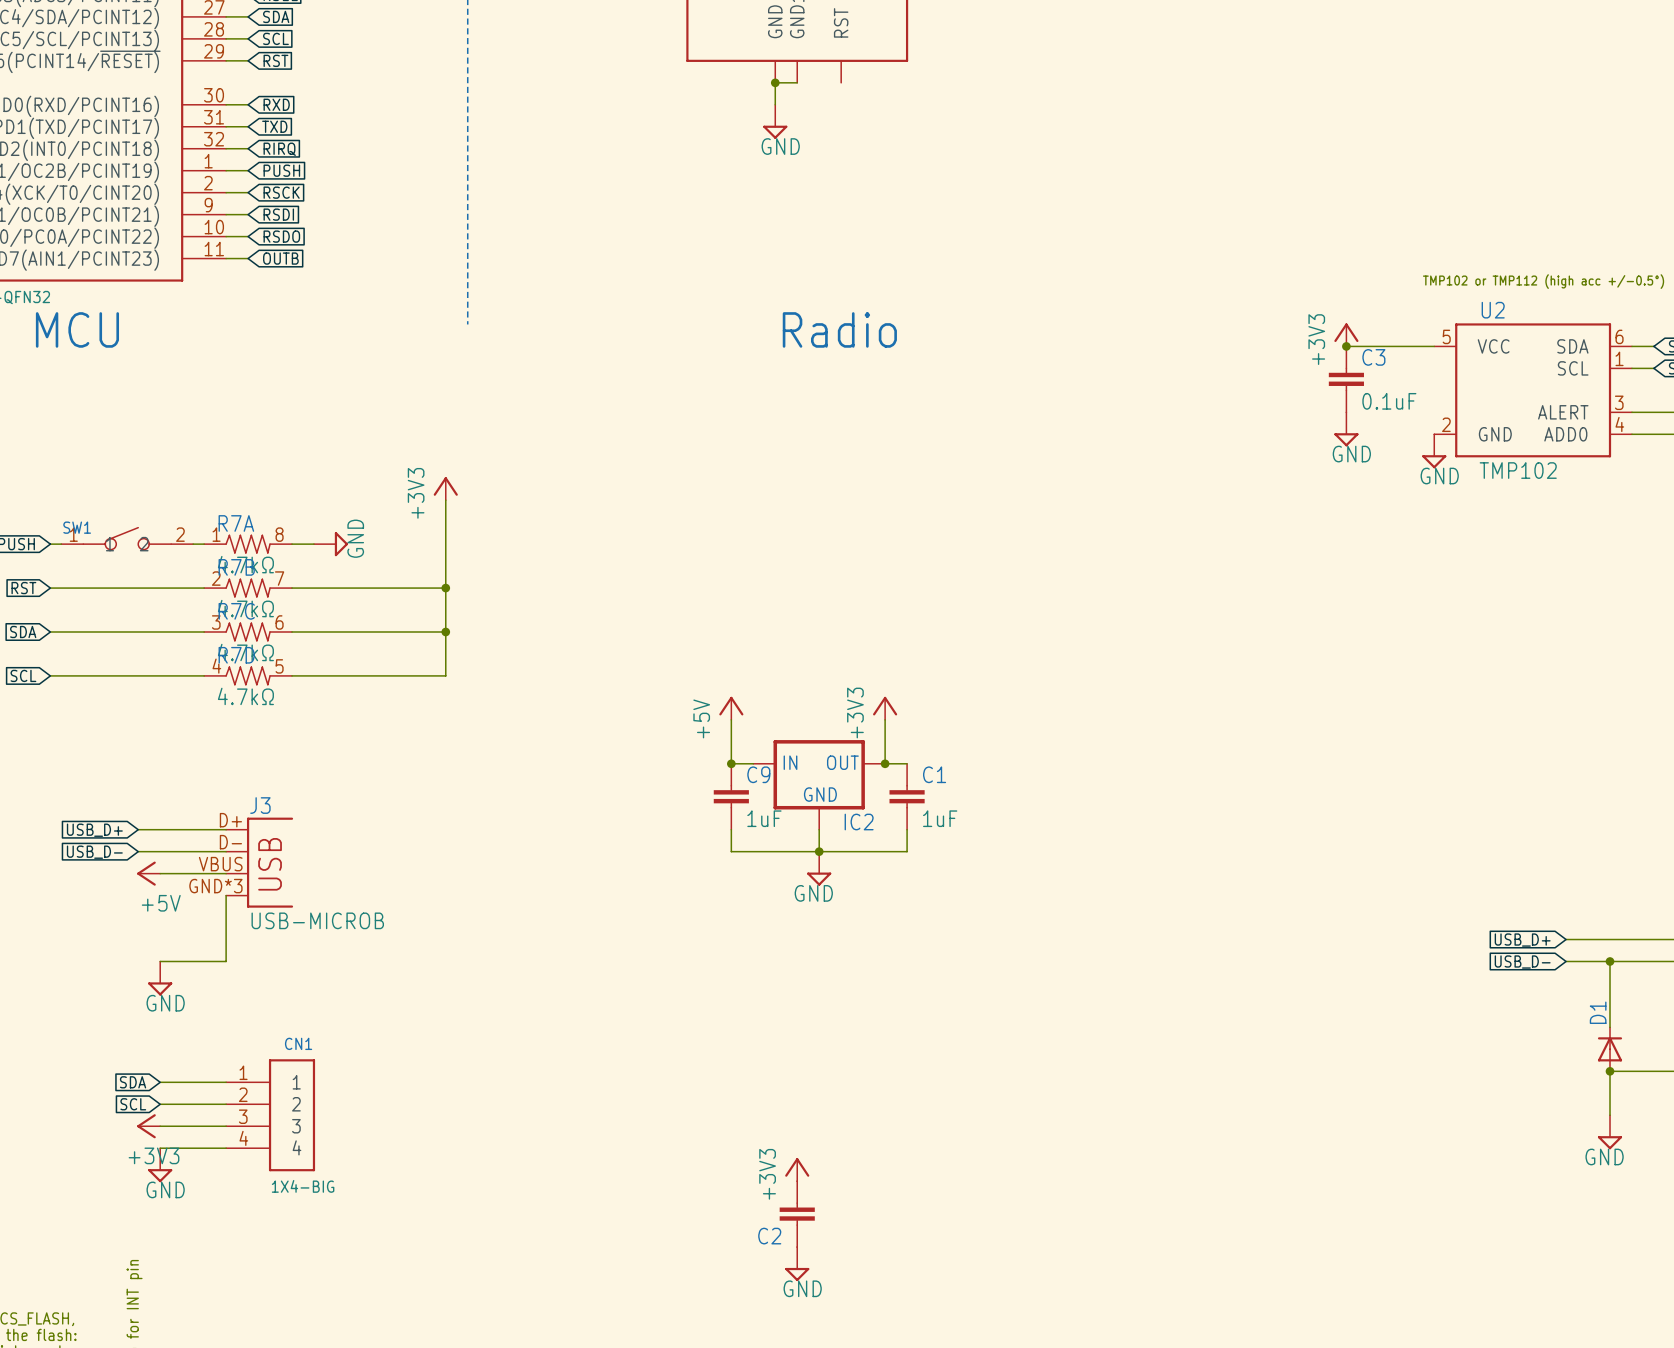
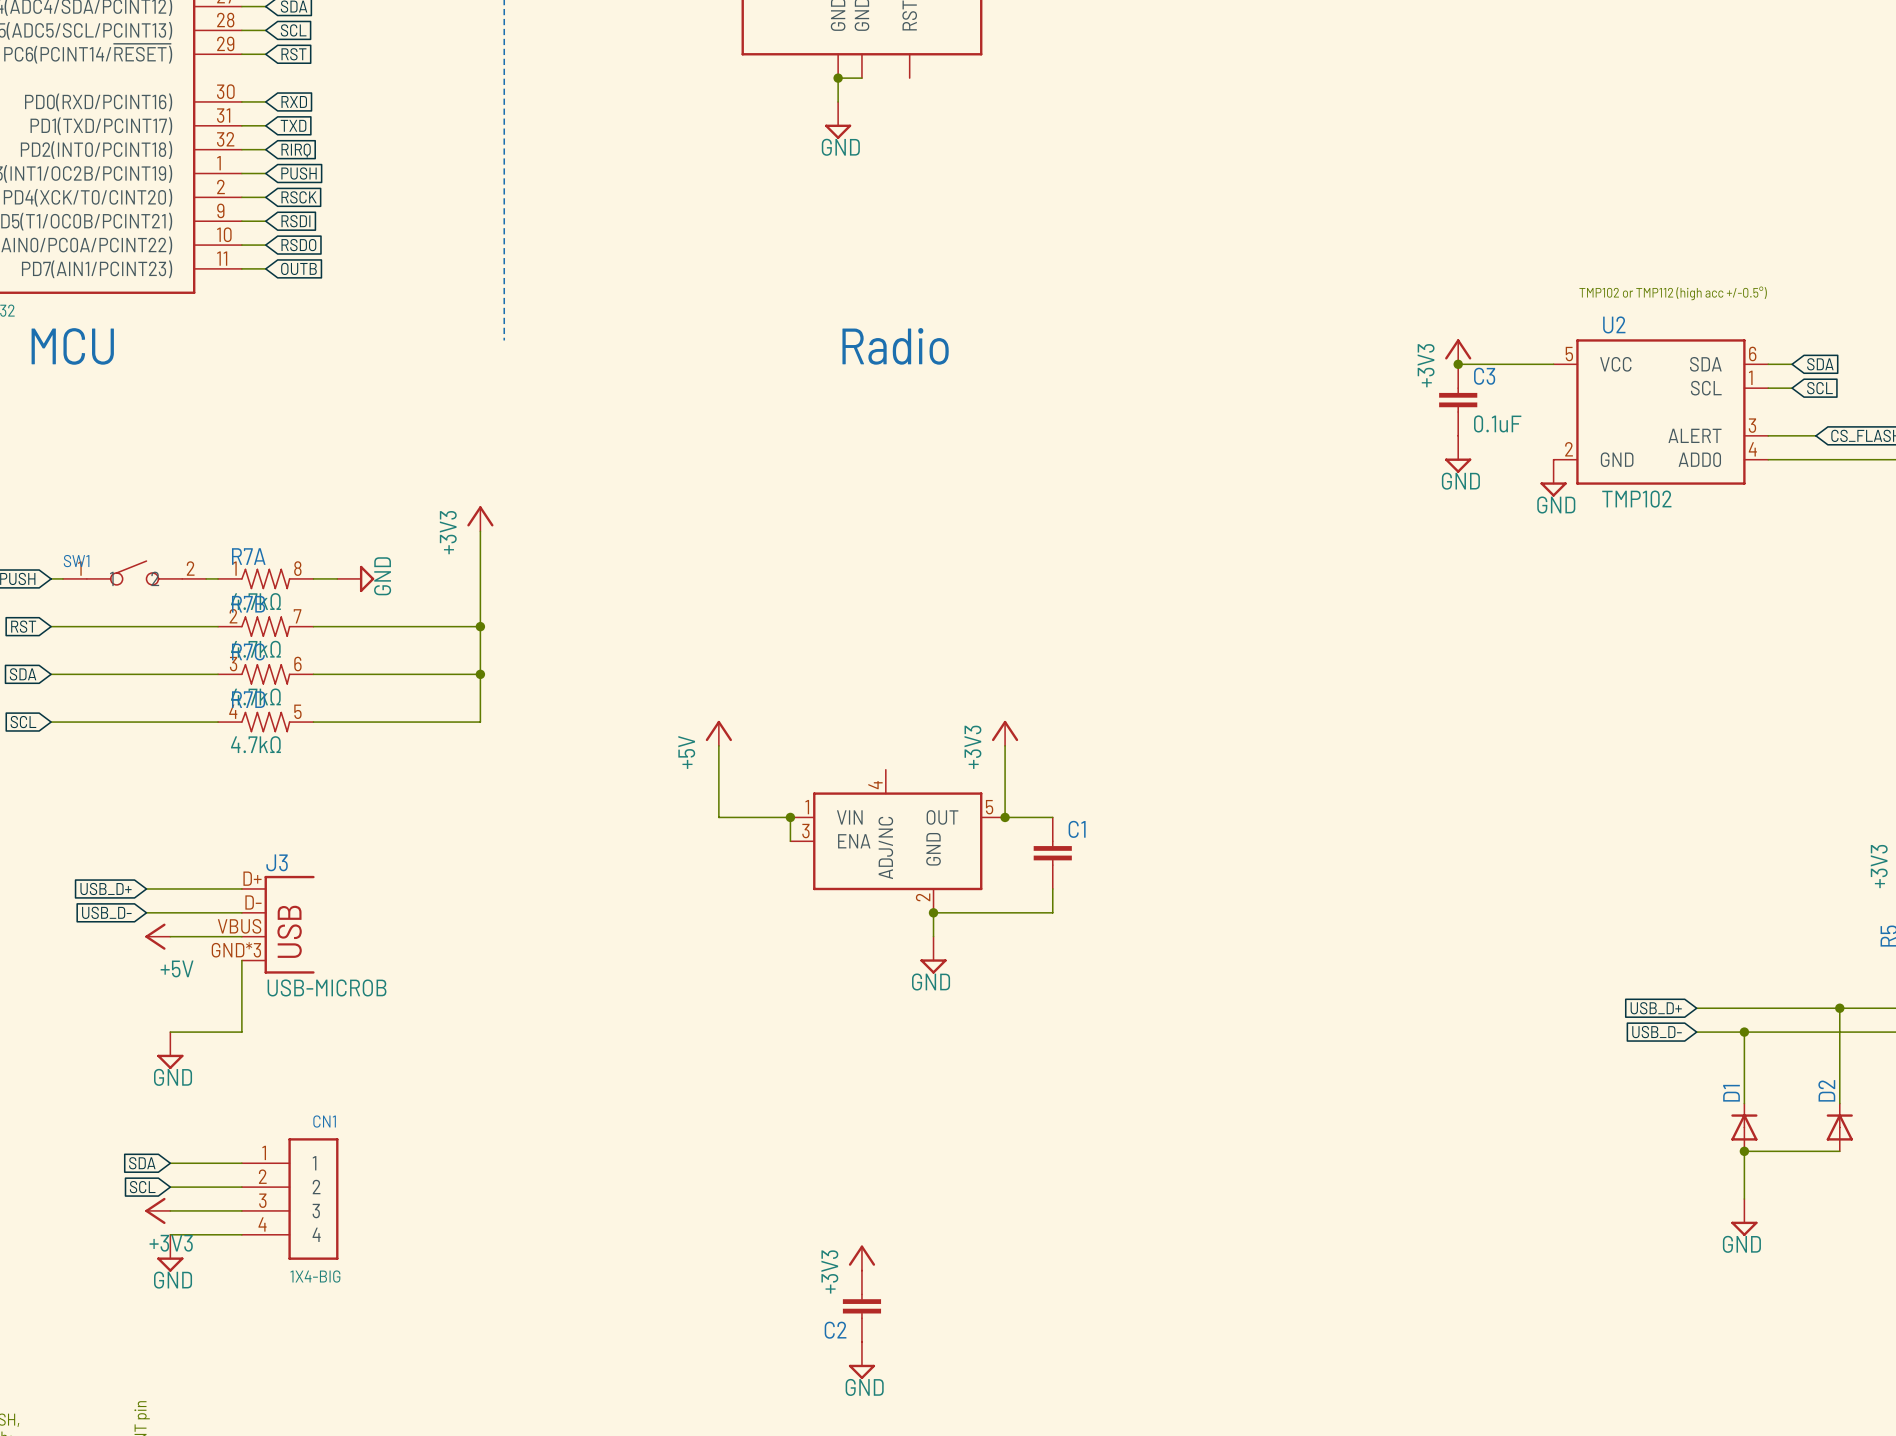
wire: none -> (718, 745) (718, 817) (790, 817) (790, 841)
wire: none -> (1005, 745) (1005, 817) (1052, 817)
power symbol position: +5V (731, 708) -> +5V (718, 733)
power symbol position: +3V3 (885, 708) -> +3V3 (1005, 733)
wire: (731, 719) (731, 763) (753, 763) -> none
wire: (885, 719) (885, 763) (907, 763) -> none
junction position: (885, 763) -> (1005, 817)
IC2: (819, 784) -> none
part: none -> (897, 841)
C9: 1uF (731, 796) -> none
C1 position: (907, 796) -> (1052, 853)
C1 value: 1uF (940, 818) -> none
wire: (731, 829) (731, 851) (863, 851) -> (933, 936) (933, 912)
wire: (819, 829) (819, 851) -> none
wire: (907, 829) (907, 851) -> (1052, 888) (1052, 912) (981, 912)
junction position: (819, 851) -> (933, 912)
power symbol position: GND (819, 868) -> GND (933, 955)

